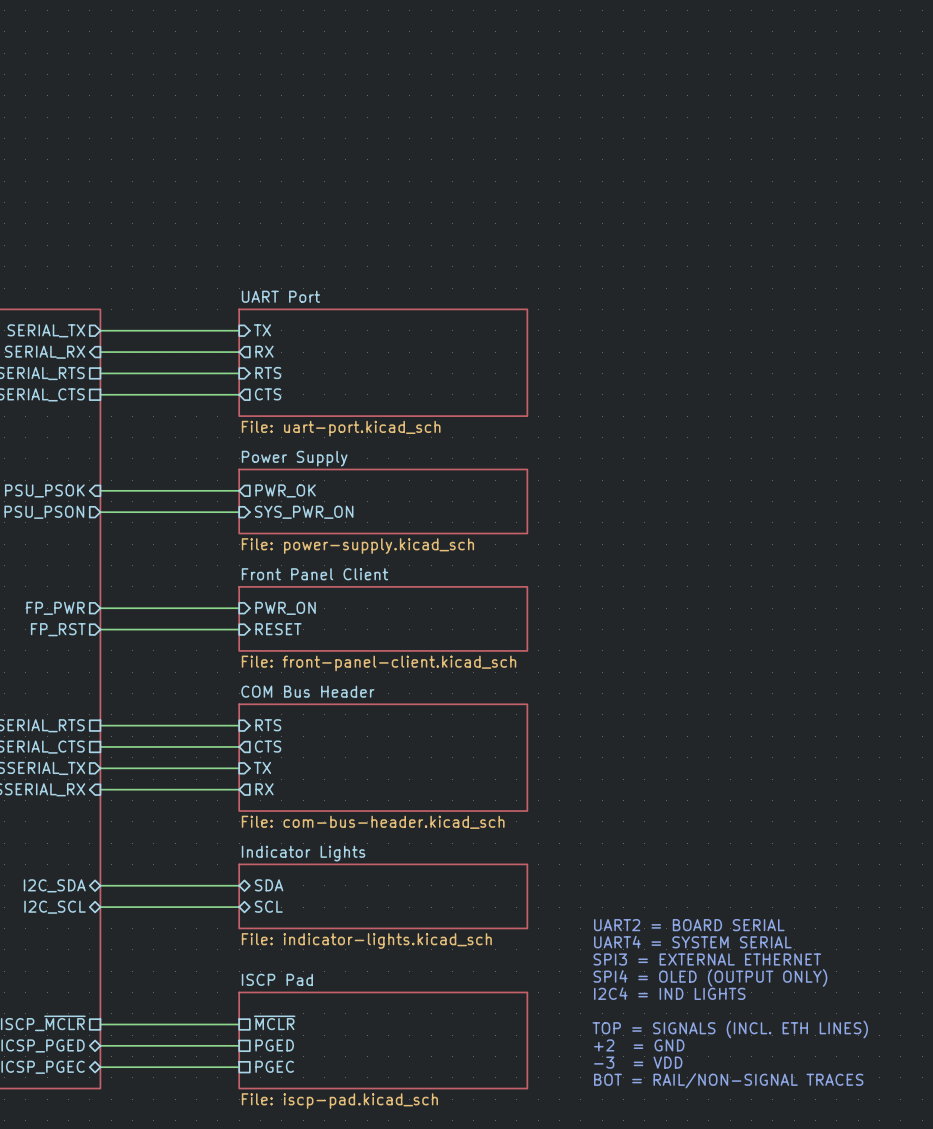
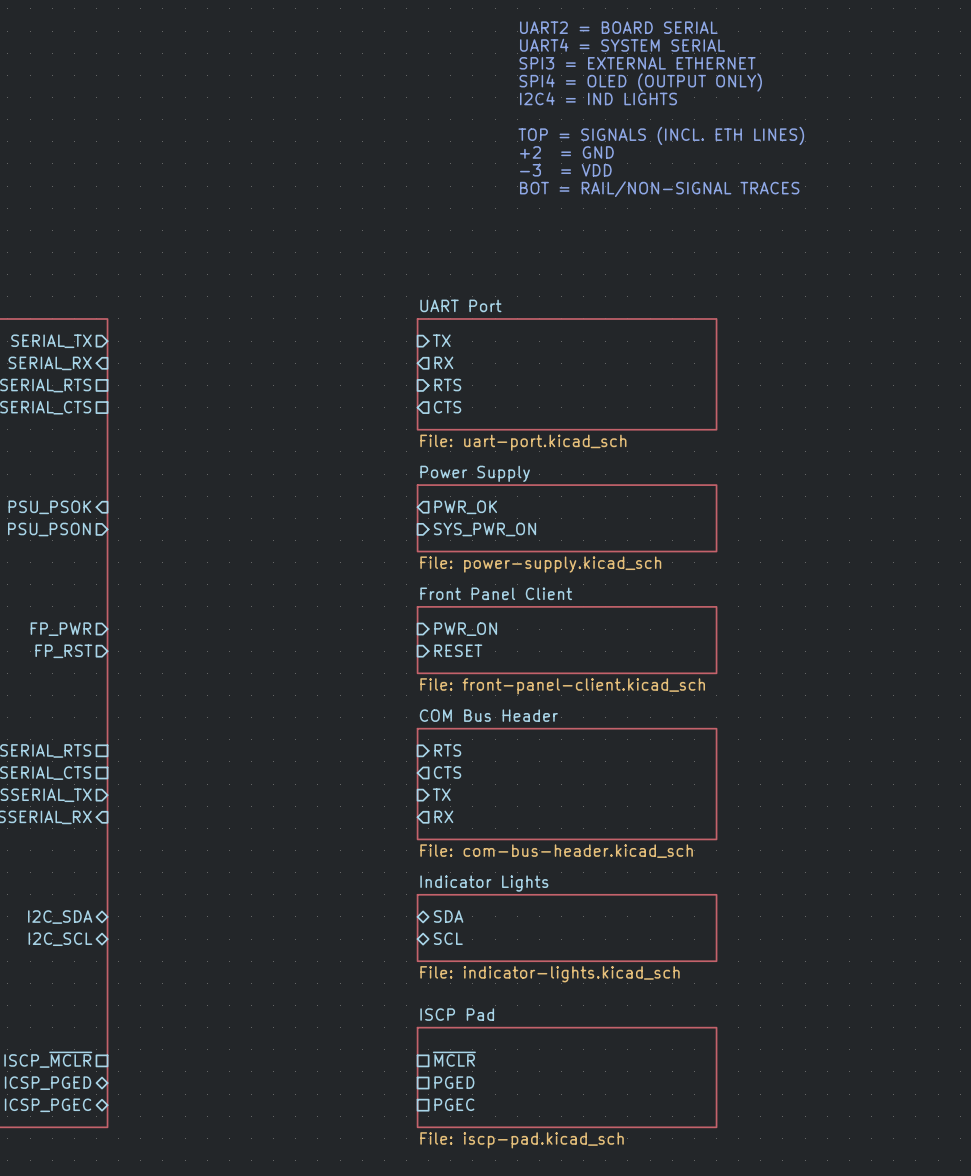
text: none -> UART2 = BOARD SERIAL (618, 27)
text: none -> UART4 = SYSTEM SERIAL (622, 45)
text: none -> SPI3 = EXTERNAL ETHERNET (637, 63)
text: none -> SPI4 = OLED (OUTPUT ONLY) (640, 82)
text: none -> I2C4 = IND LIGHTS (598, 98)
text: none -> TOP = SIGNALS (INCL. ETH LINES) (661, 135)
text: none -> +2 = GND (566, 152)
text: none -> -3 = VDD (565, 170)
text: none -> BOT = RAIL/NON-SIGNAL TRACES (659, 189)
wire: (100, 330) (239, 330) -> none
sheet pin position: TX (262, 330) -> TX (441, 340)
sheet pin position: RX (264, 351) -> RX (443, 362)
wire: (100, 352) (239, 352) -> none
sheet UART Port position: (383, 362) -> (567, 374)
wire: (100, 373) (239, 373) -> none
sheet pin position: RTS (268, 373) -> RTS (447, 385)
wire: (100, 394) (239, 394) -> none
sheet pin position: CTS (268, 394) -> CTS (447, 407)
wire: (100, 490) (239, 490) -> none
sheet pin position: PWR_OK (285, 490) -> PWR_OK (465, 507)
sheet Power Supply position: (383, 501) -> (567, 518)
wire: (100, 512) (239, 512) -> none
sheet pin position: SYS_PWR_ON (304, 512) -> SYS_PWR_ON (484, 529)
wire: (100, 608) (239, 608) -> none
sheet pin position: PWR_ON (285, 608) -> PWR_ON (465, 629)
sheet Front Panel Client position: (383, 618) -> (567, 640)
wire: (100, 629) (239, 629) -> none
sheet pin position: RESET (278, 629) -> RESET (458, 650)
wire: (100, 725) (239, 725) -> none
sheet pin position: RTS (268, 725) -> RTS (447, 750)
wire: (100, 746) (239, 746) -> none
sheet pin position: CTS (268, 746) -> CTS (447, 772)
sheet COM Bus Header position: (383, 757) -> (567, 784)
sheet pin position: TX (262, 767) -> TX (441, 794)
wire: (100, 768) (239, 768) -> none
wire: (100, 789) (239, 789) -> none
sheet pin position: RX (264, 789) -> RX (443, 816)
wire: (100, 885) (239, 885) -> none
sheet pin position: SDA (269, 885) -> SDA (448, 916)
sheet Indicator Lights position: (383, 896) -> (567, 928)
sheet pin position: SCL (268, 906) -> SCL (448, 938)
wire: (100, 907) (239, 907) -> none
text: UART2 = BOARD SERIAL (689, 925) -> none
text: UART4 = SYSTEM SERIAL (692, 942) -> none
text: SPI3 = EXTERNAL ETHERNET (707, 959) -> none
text: SPI4 = OLED (OUTPUT ONLY) (710, 977) -> none
text: I2C4 = IND LIGHTS (669, 993) -> none
sheet pin position: ~{MCLR} (274, 1022) -> ~{MCLR} (454, 1059)
wire: (100, 1024) (239, 1024) -> none
text: TOP = SIGNALS (INCL. ETH LINES) (730, 1029) -> none
sheet ISCP Pad position: (383, 1040) -> (567, 1077)
wire: (100, 1045) (239, 1045) -> none
sheet pin position: PGED (274, 1045) -> PGED (454, 1082)
text: +2 = GND (639, 1045) -> none
text: -3 = VDD (638, 1062) -> none
sheet pin position: PGEC (274, 1066) -> PGEC (454, 1104)
wire: (100, 1067) (239, 1067) -> none
text: BOT = RAIL/NON-SIGNAL TRACES (728, 1080) -> none

